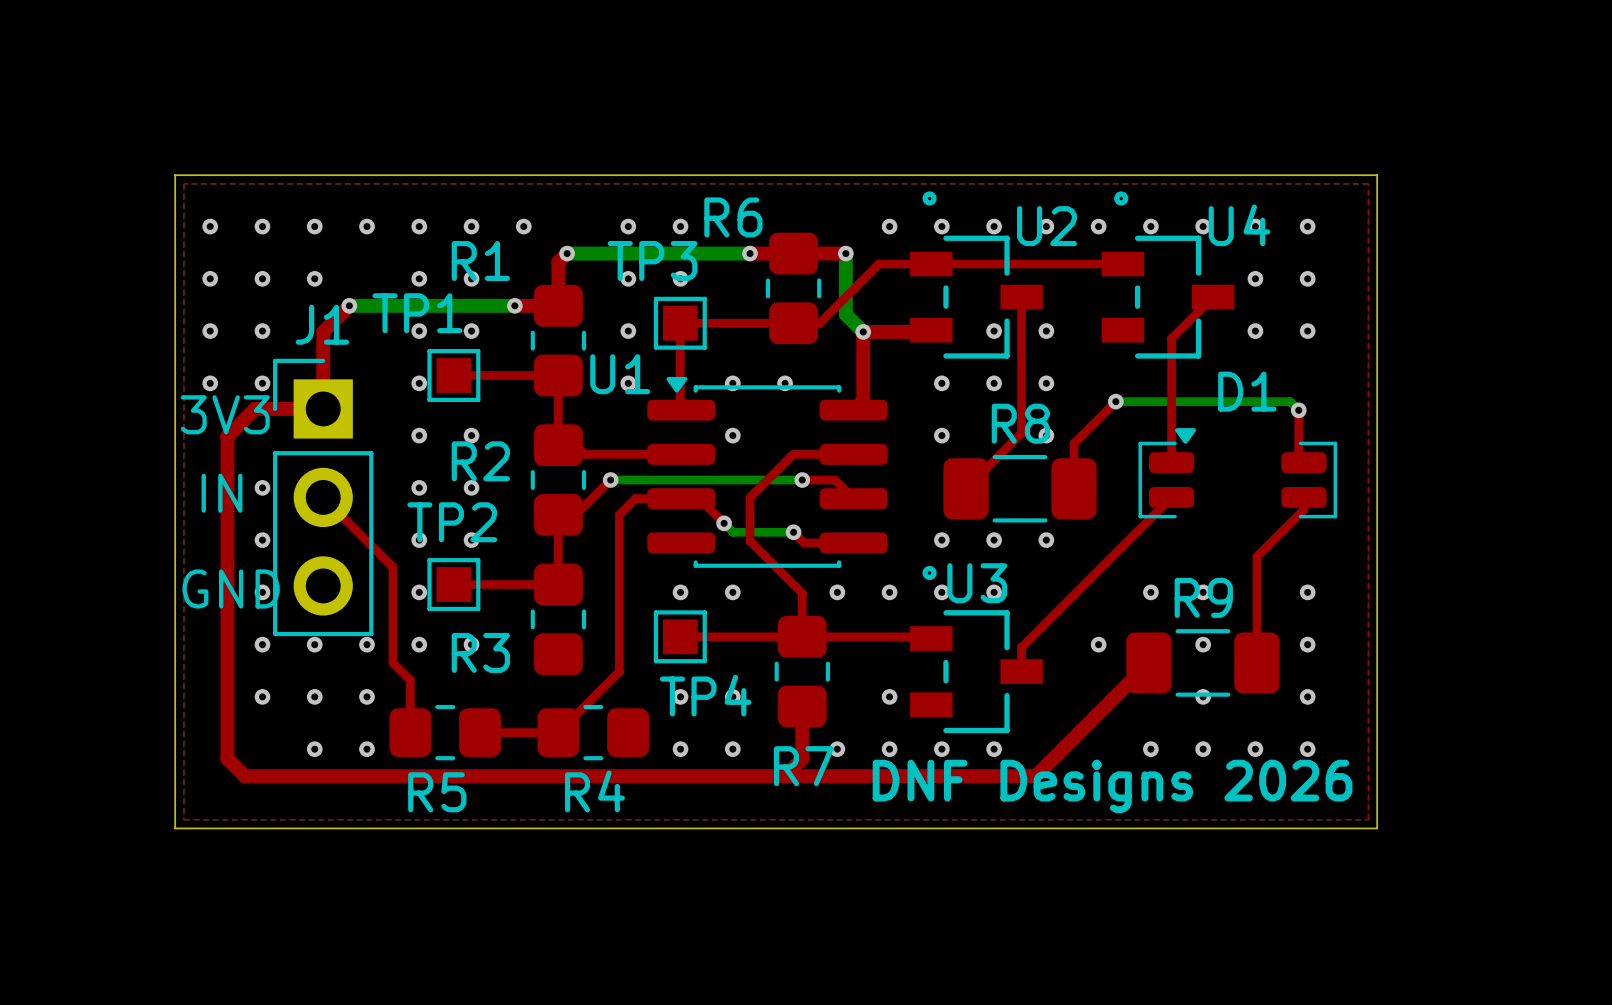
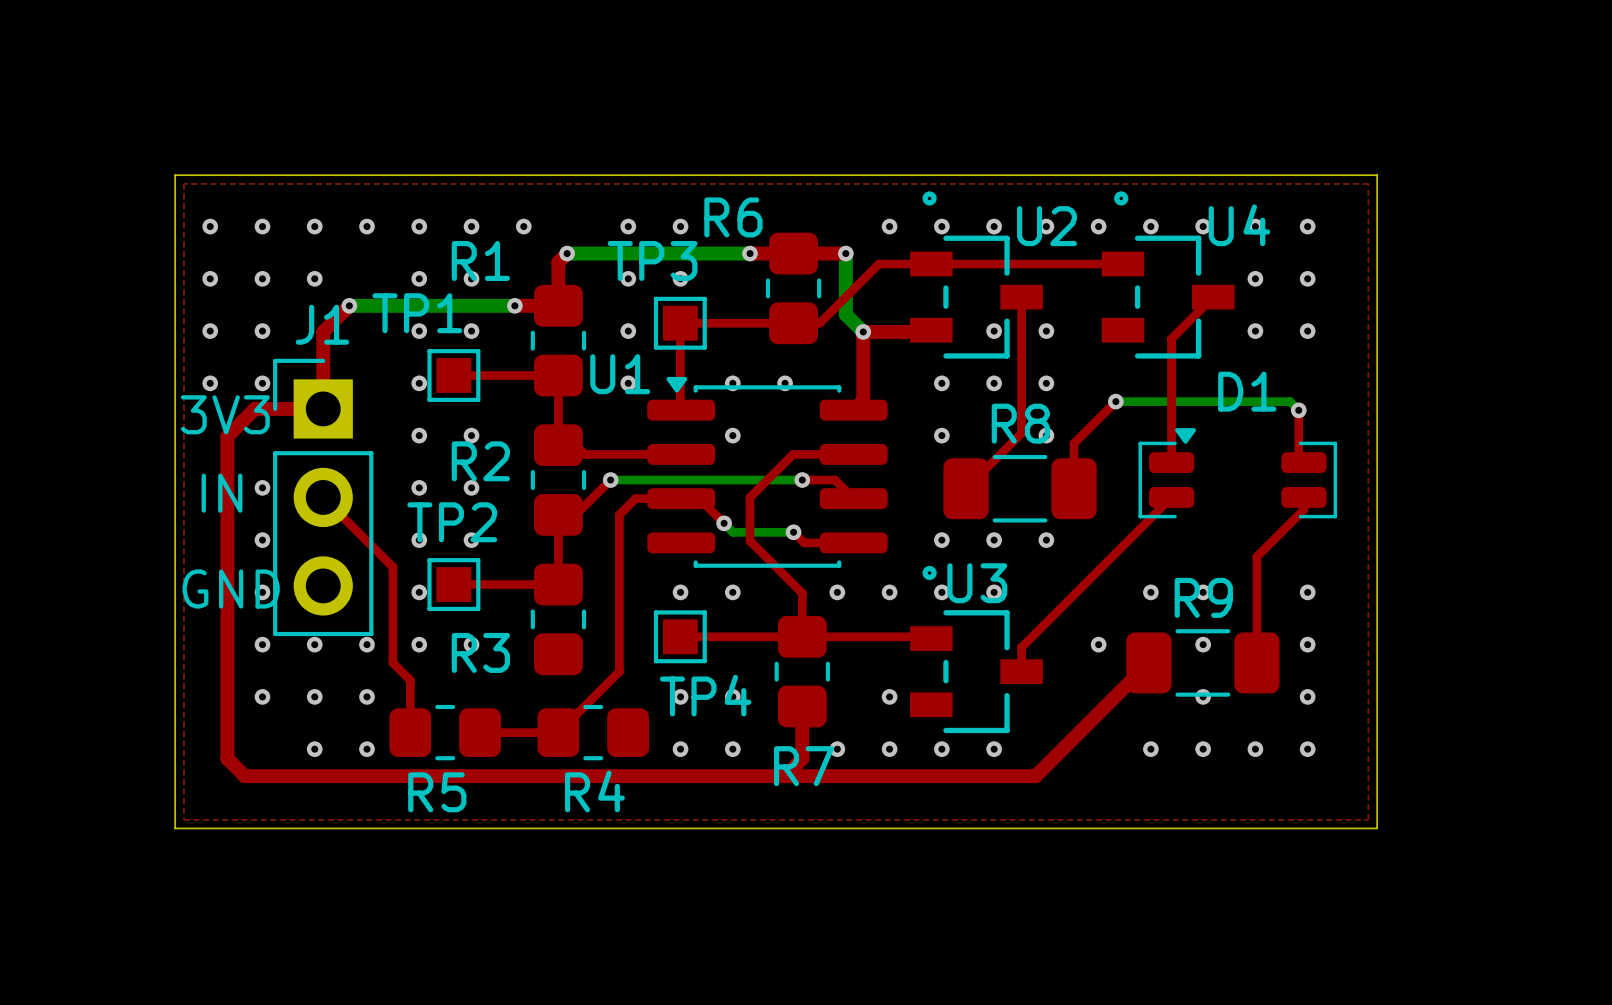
text: DNF Designs 2026 (1112, 786) -> none

